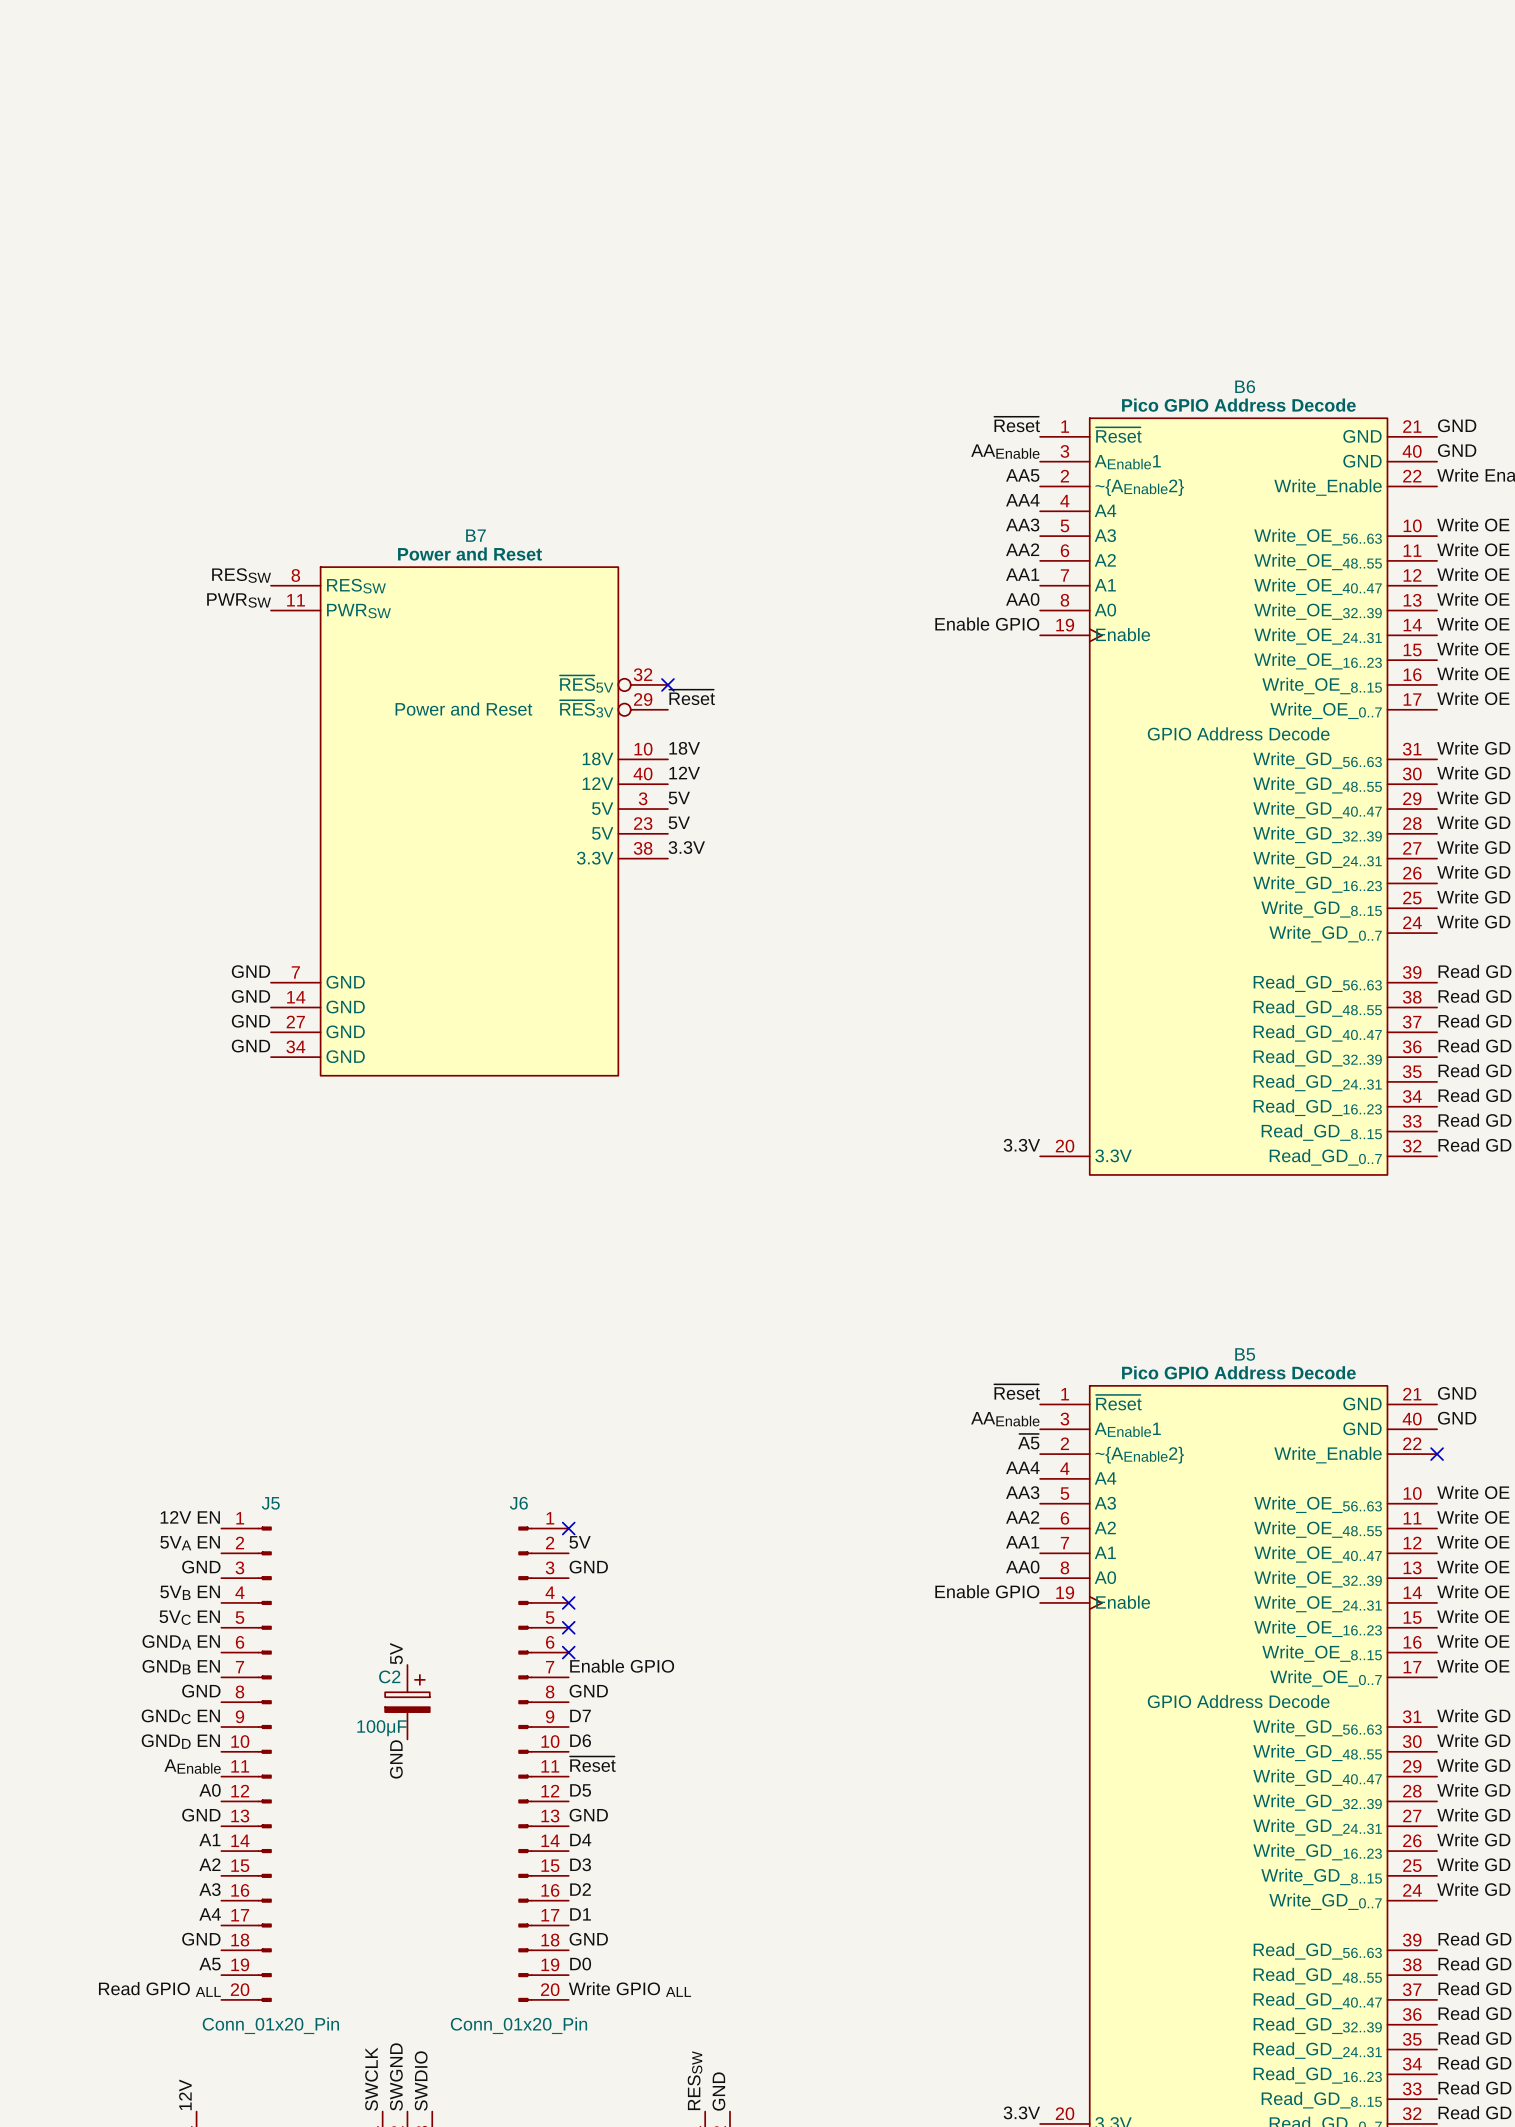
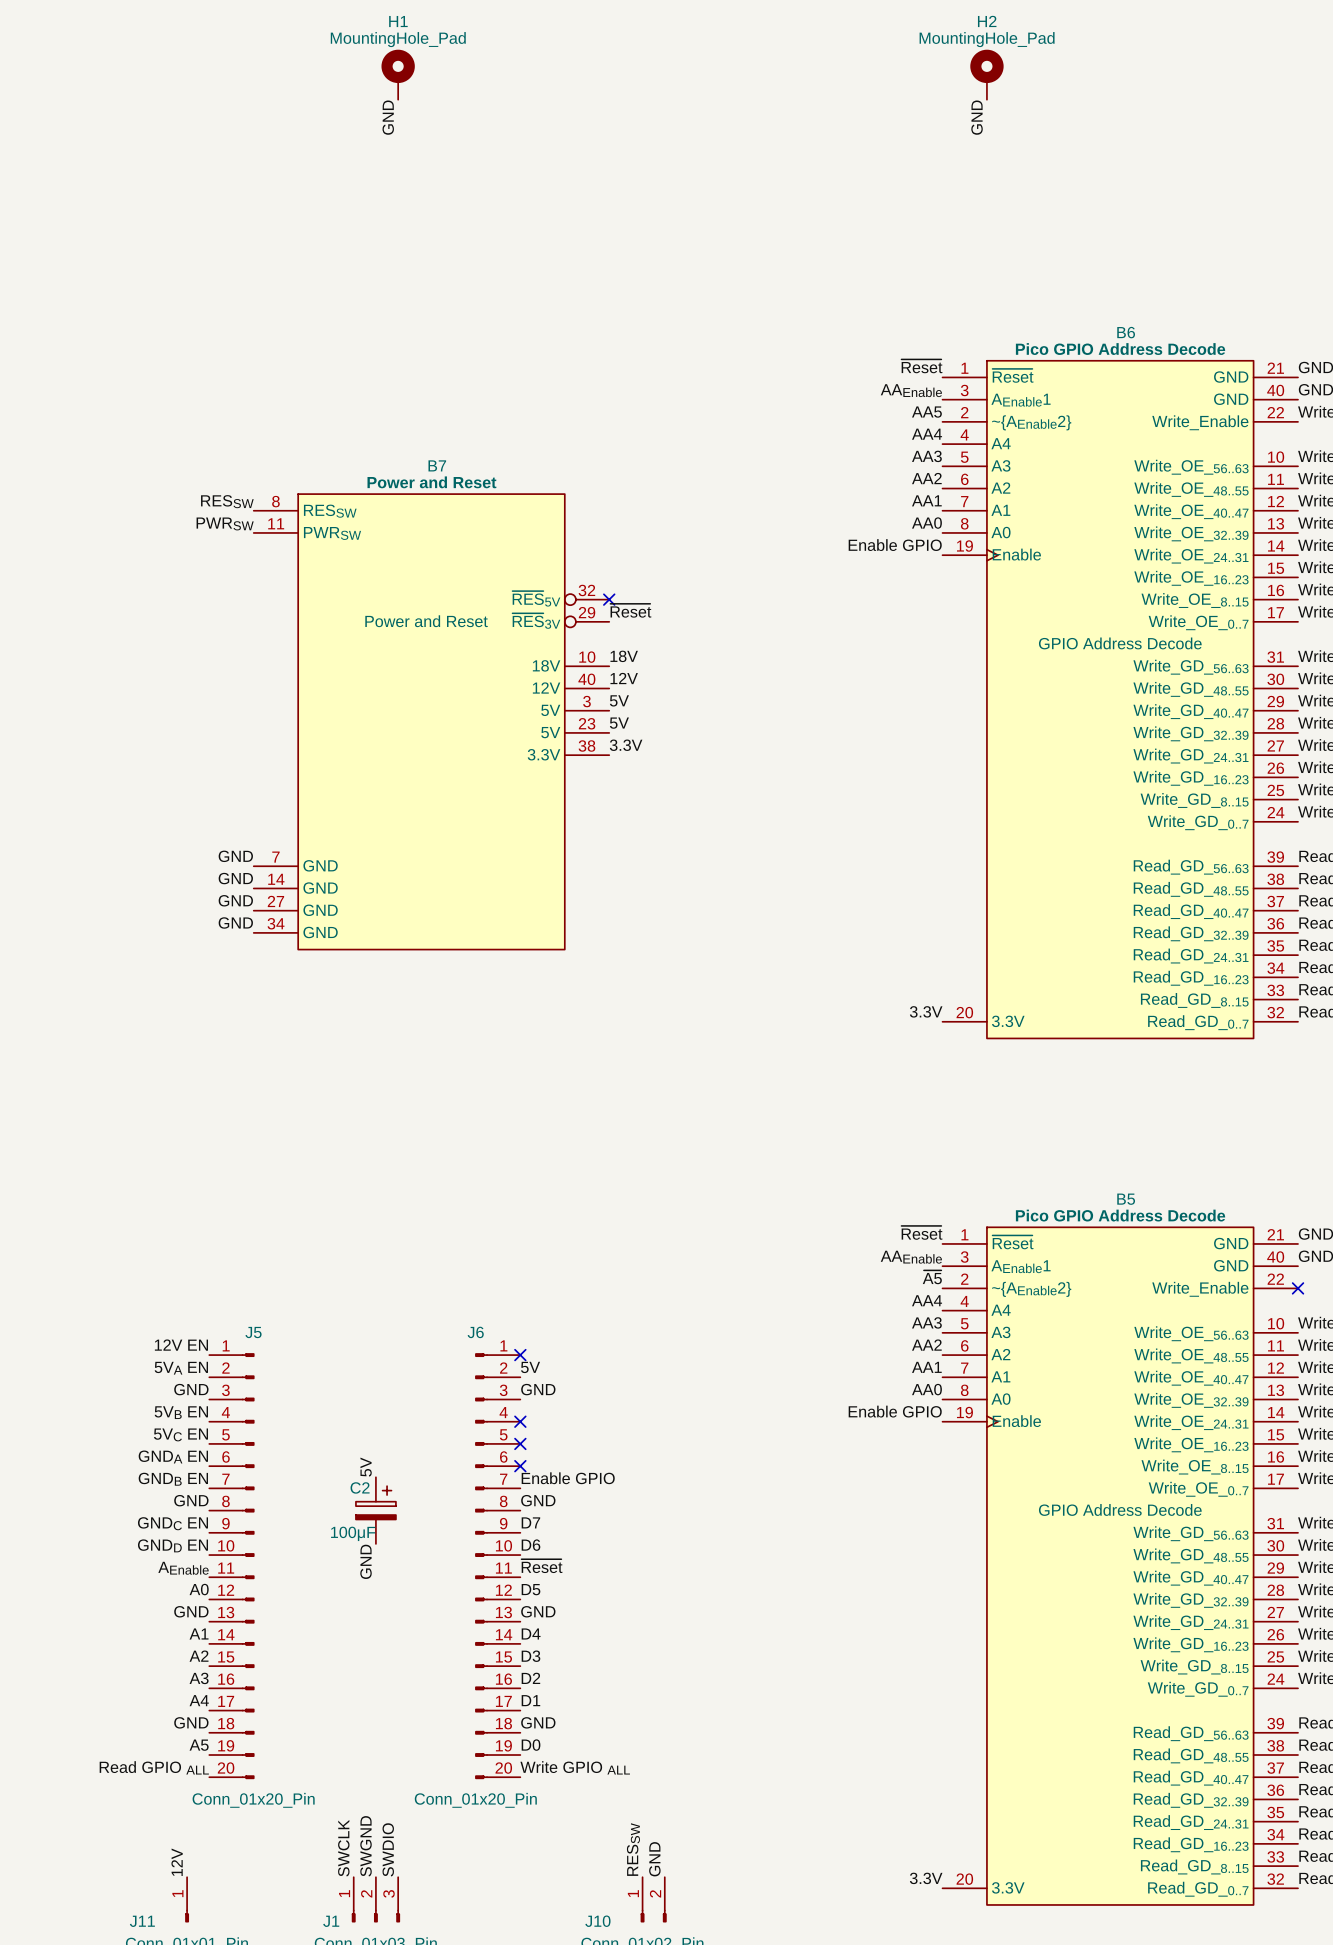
H1: none -> MountingHole_Pad (398, 74)
H2: none -> MountingHole_Pad (986, 74)
label: none -> GND (388, 117)
label: none -> GND (977, 117)

